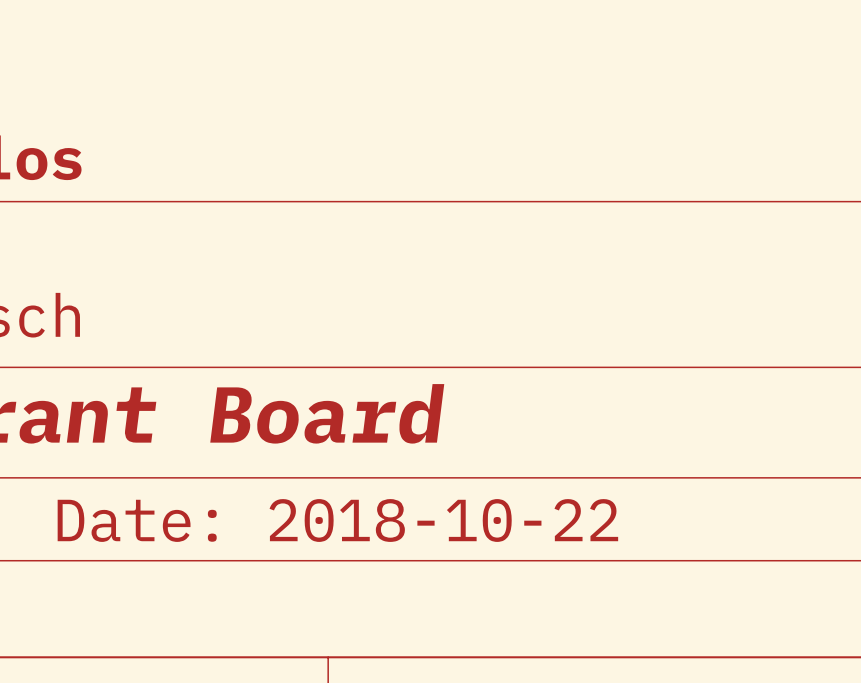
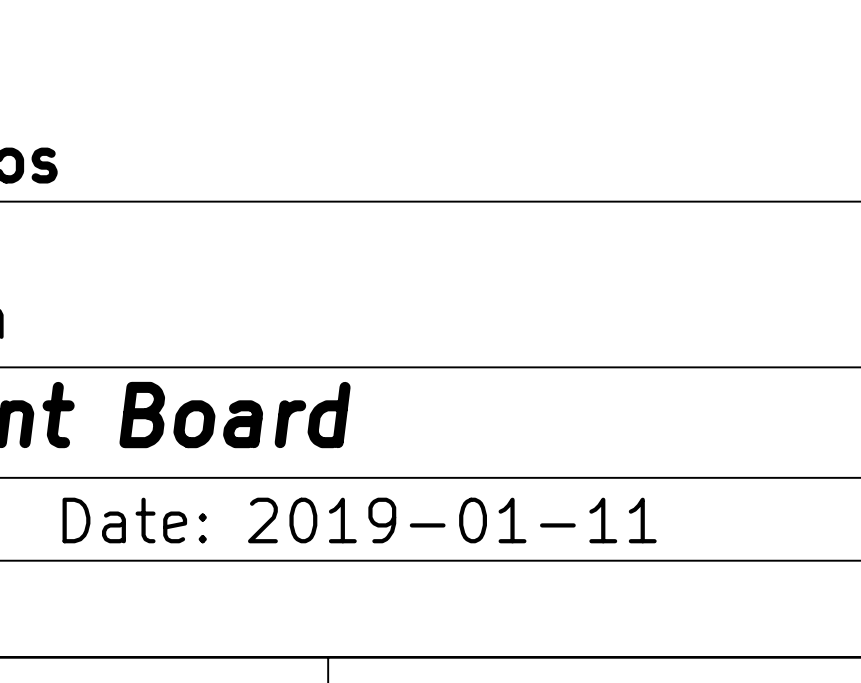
title block: Date: 2018-10-22 (337, 520) -> Date: 2019-01-11 (359, 520)

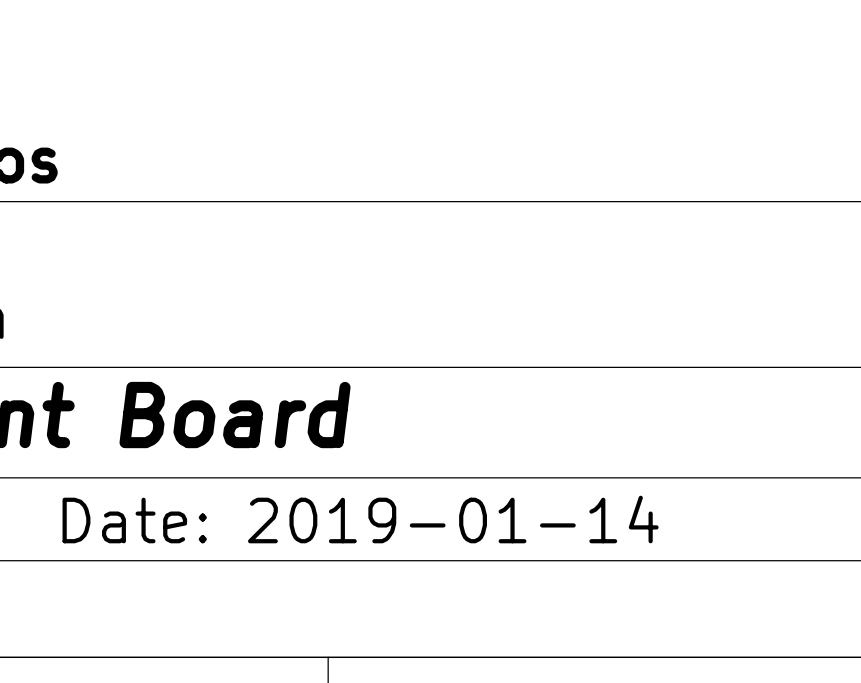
title block: Date: 2019-01-11 (359, 520) -> Date: 2019-01-14 (360, 519)

